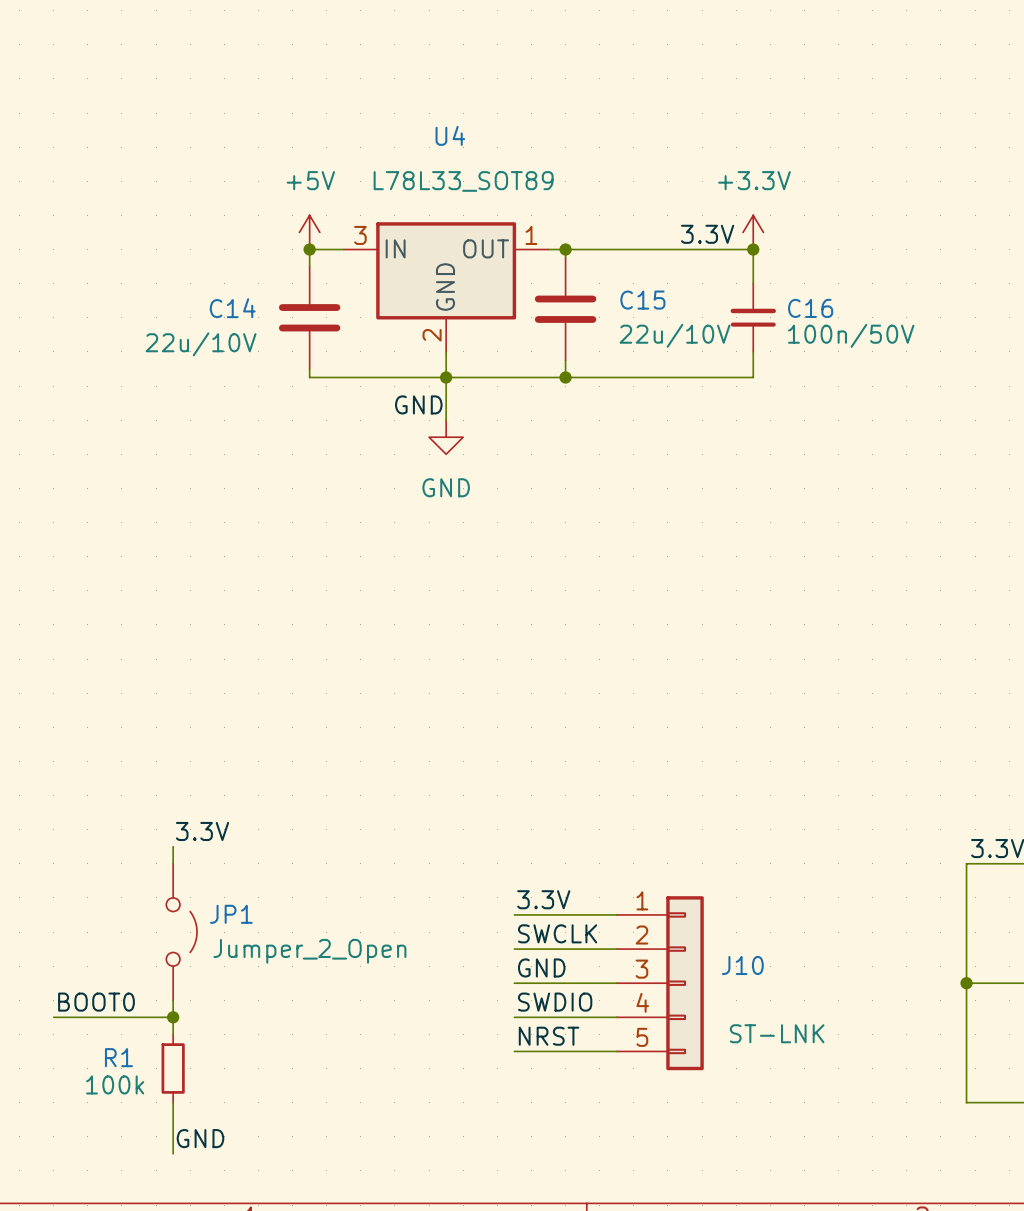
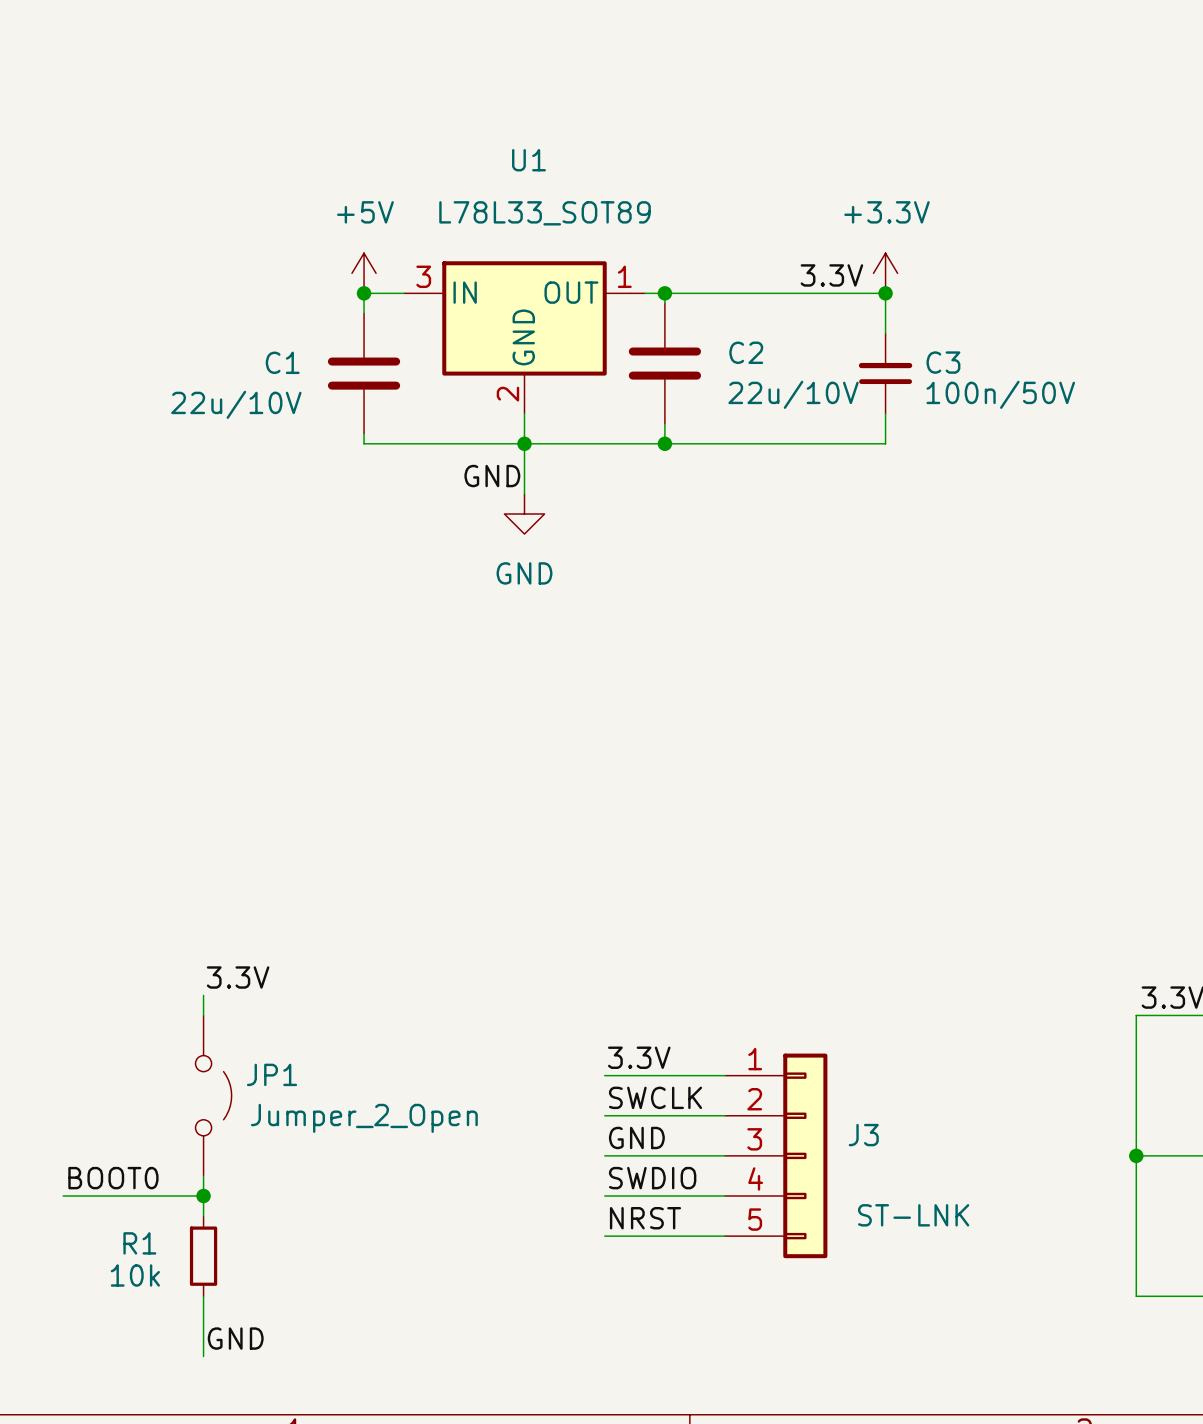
U4 name: U4 (450, 135) -> U1 (528, 160)
C15 name: C15 (642, 300) -> C2 (746, 352)
C14 name: C14 (232, 308) -> C1 (282, 362)
C16 name: C16 (810, 308) -> C3 (943, 362)
J10 name: J10 (742, 965) -> J3 (863, 1135)
R1 value: 100k (115, 1084) -> 10k (135, 1275)

